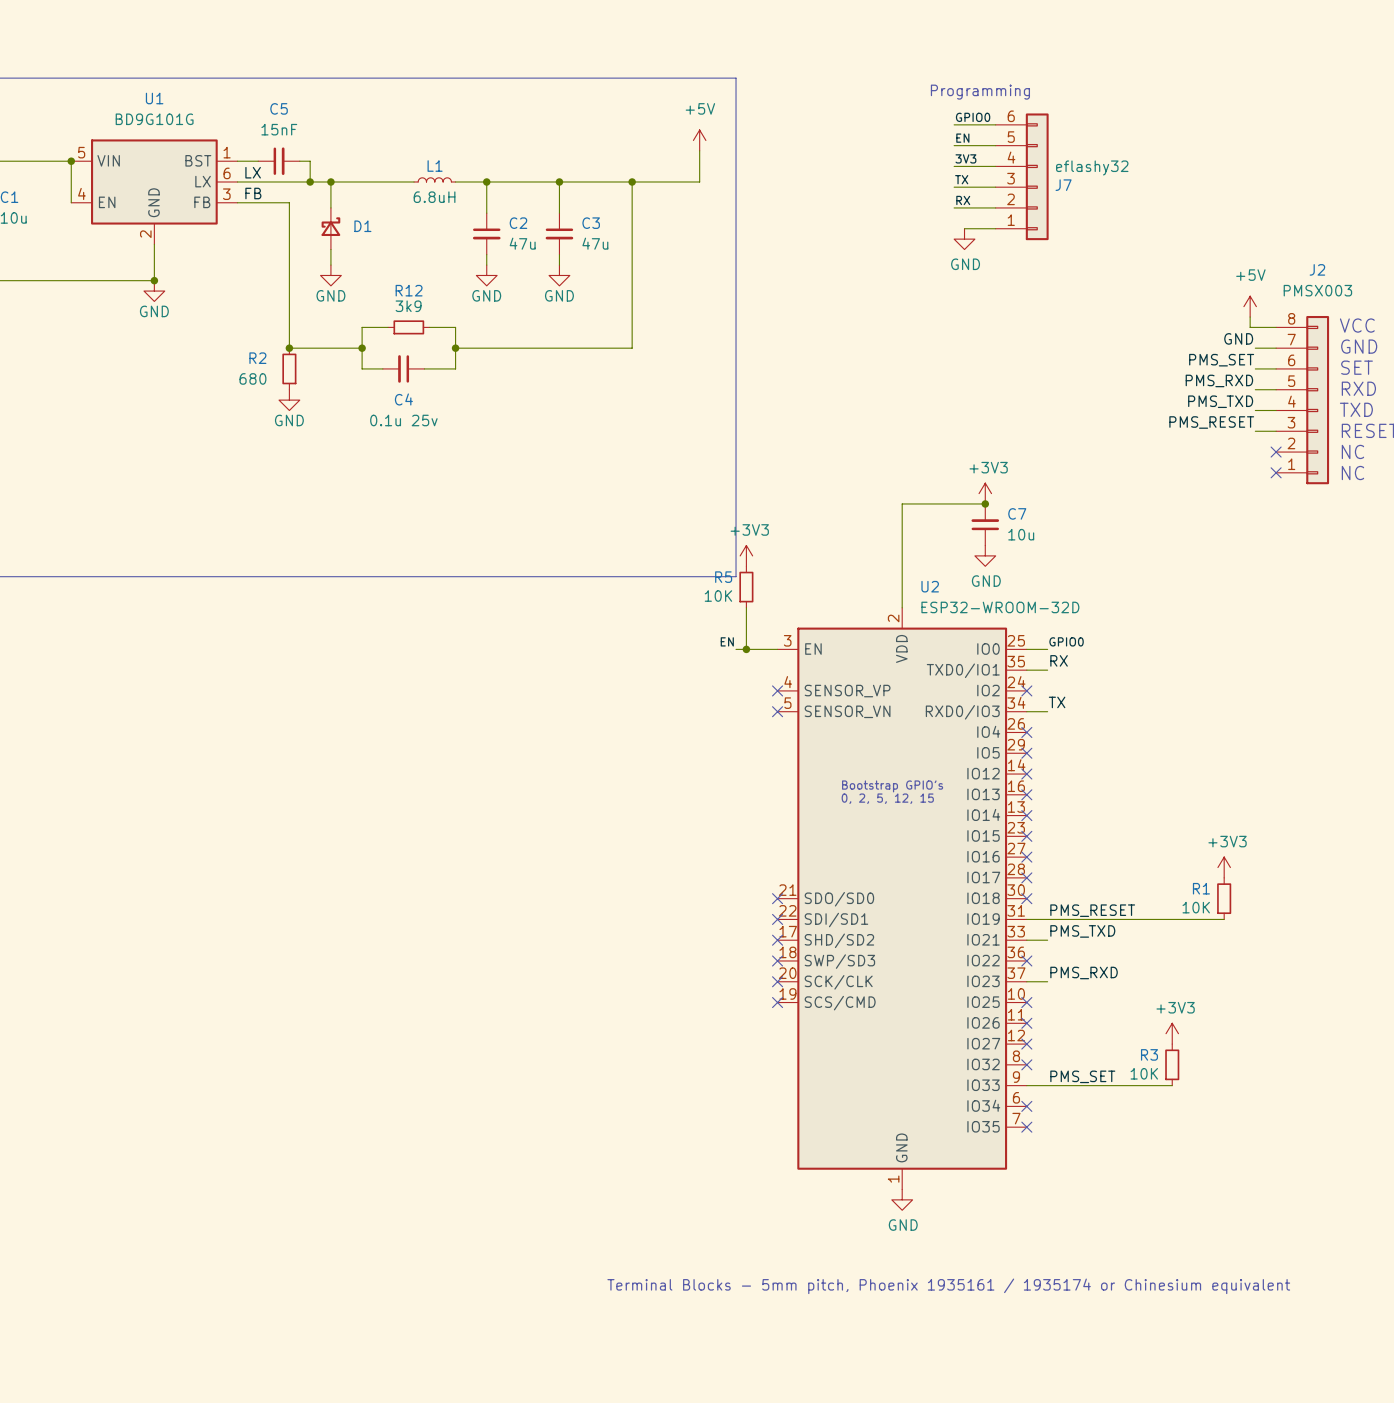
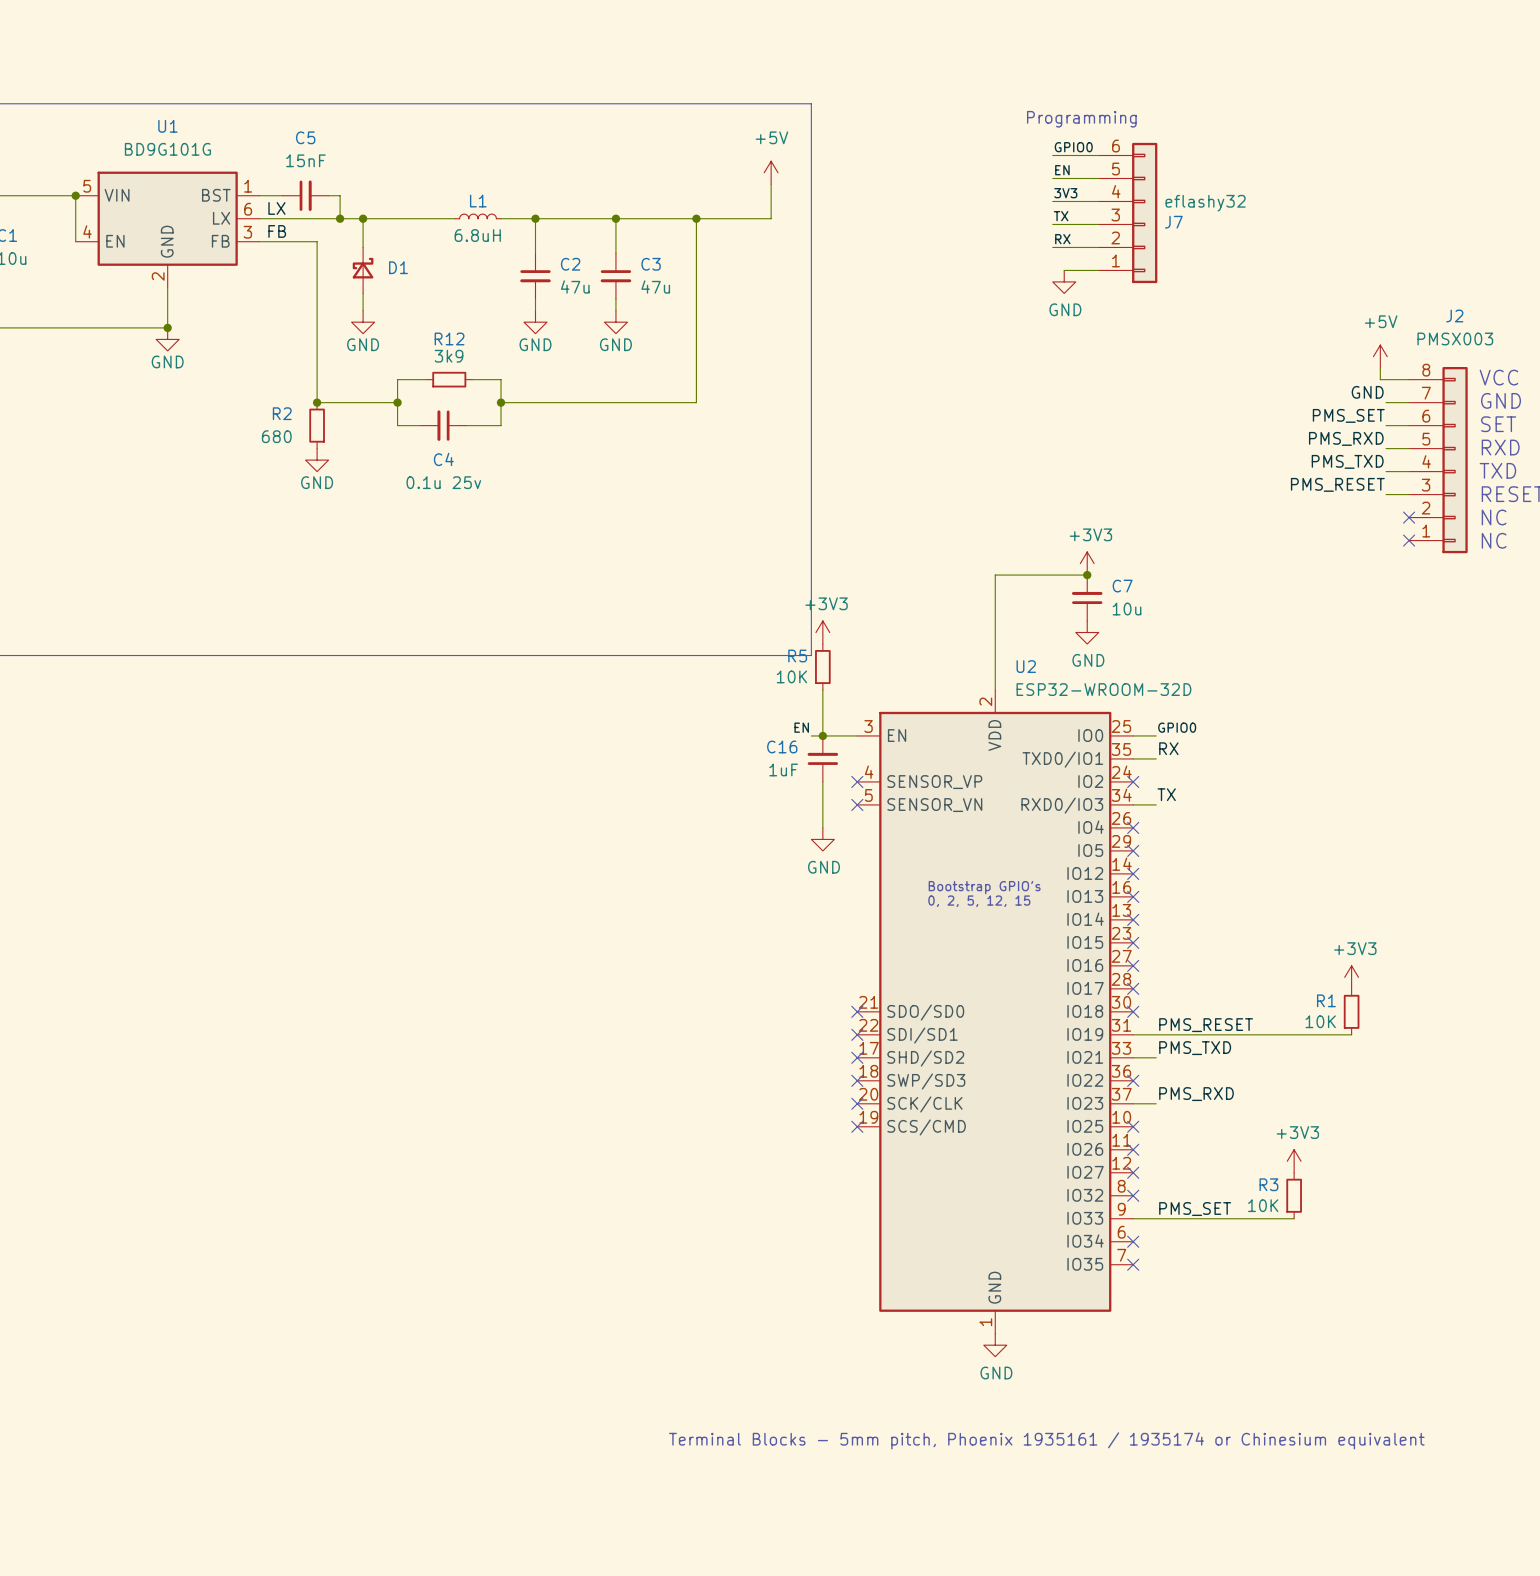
C16: none -> 1uF (822, 758)
wire: none -> (822, 781) (822, 827)
power symbol: none -> GND (822, 839)

